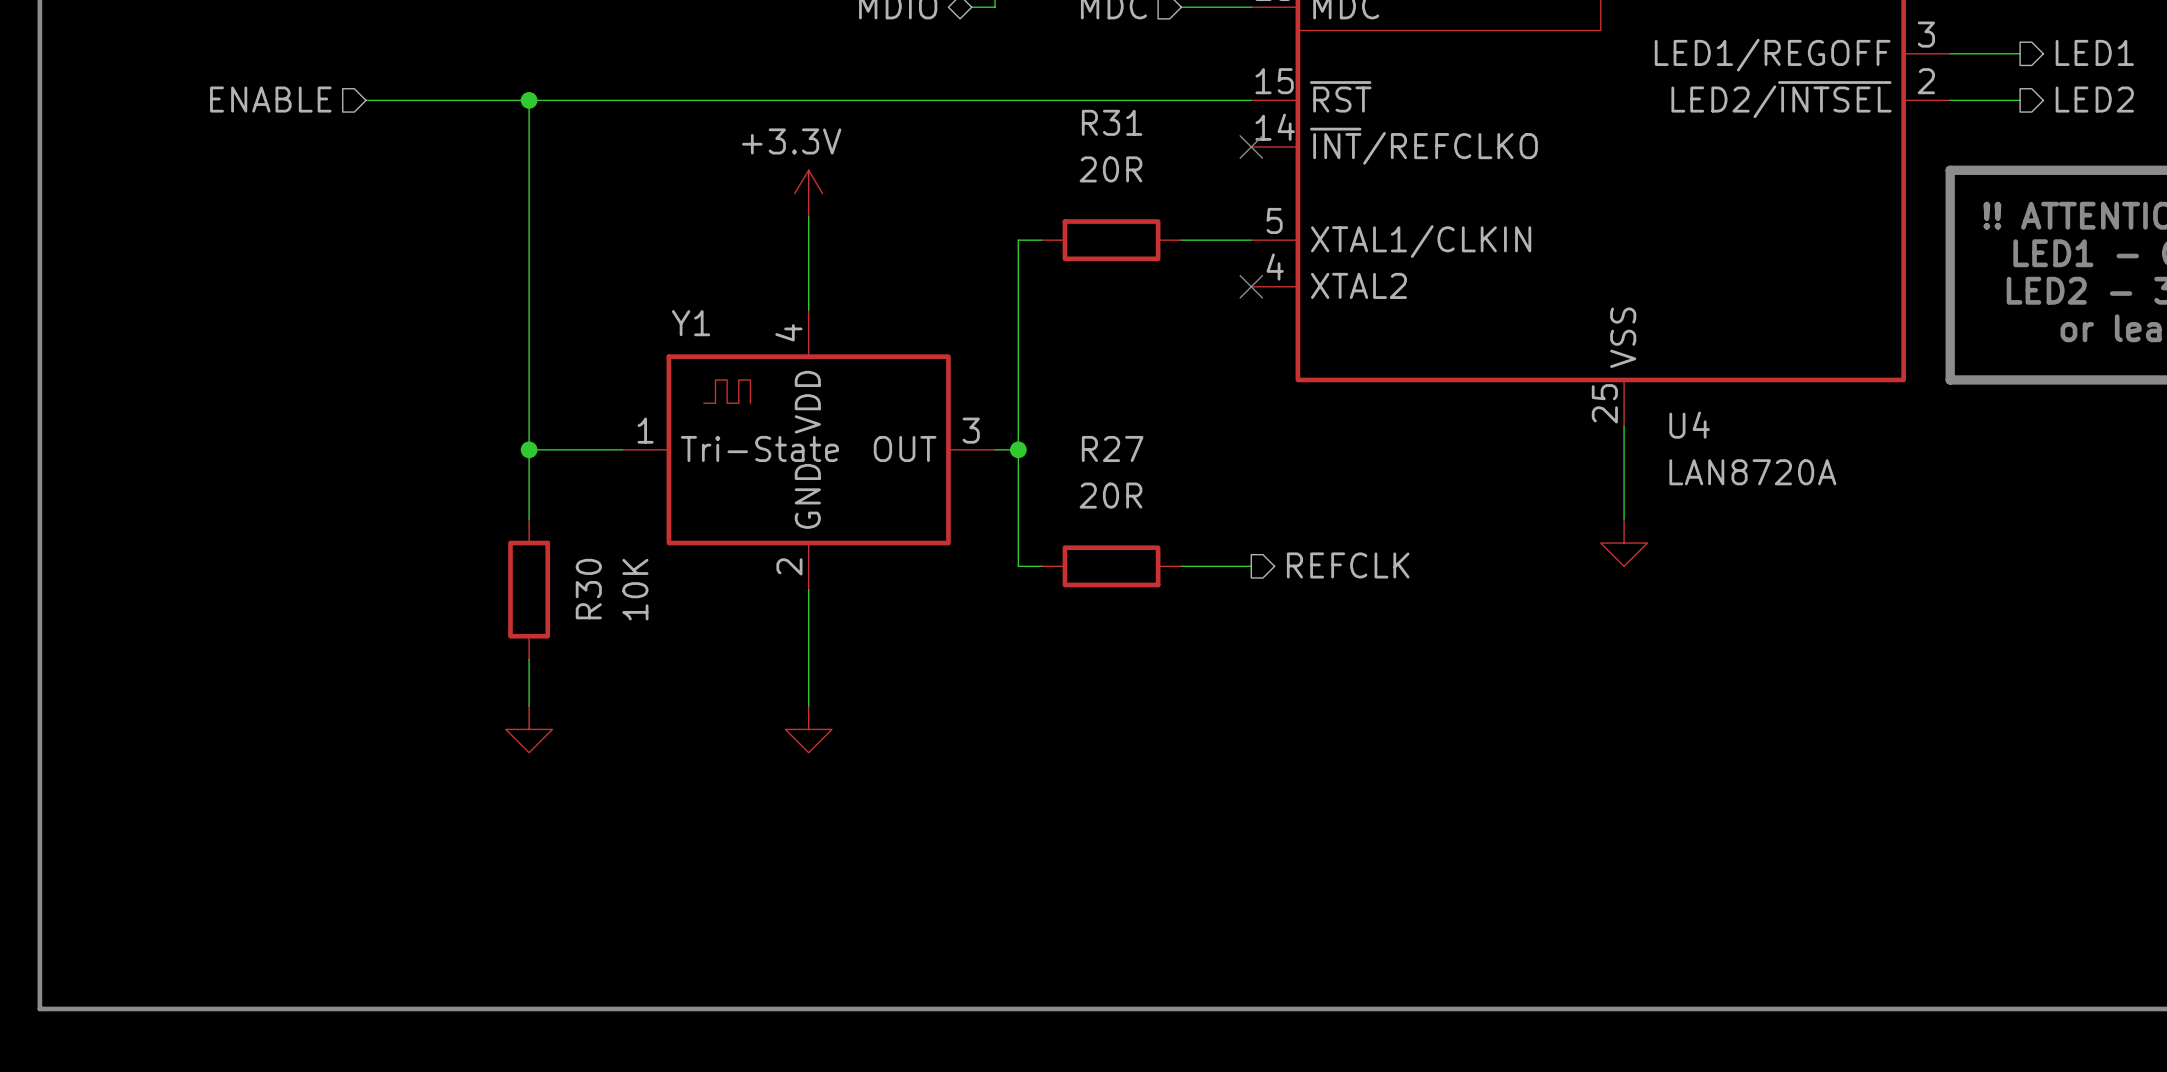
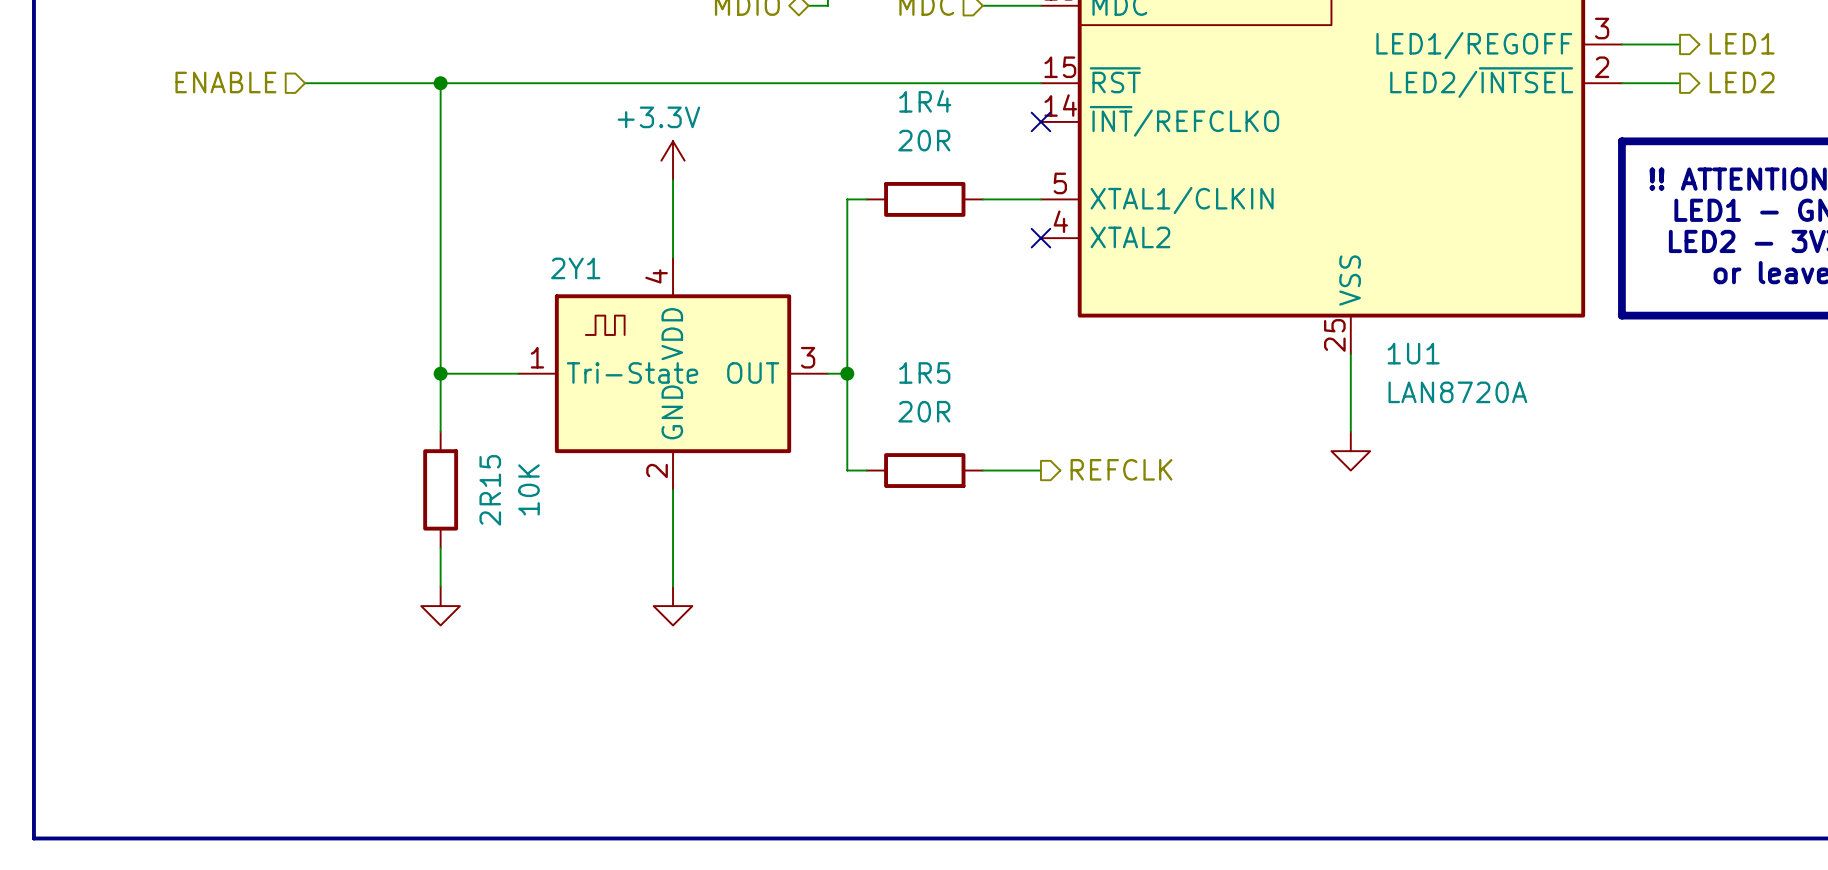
R31 name: R31 (1112, 122) -> 1R4 (925, 101)
Y1 name: Y1 (691, 323) -> 2Y1 (575, 268)
U4 name: U4 (1689, 425) -> 1U1 (1413, 353)
R27 name: R27 (1112, 448) -> 1R5 (924, 372)
R30 name: R30 (588, 589) -> 2R15 (490, 490)

